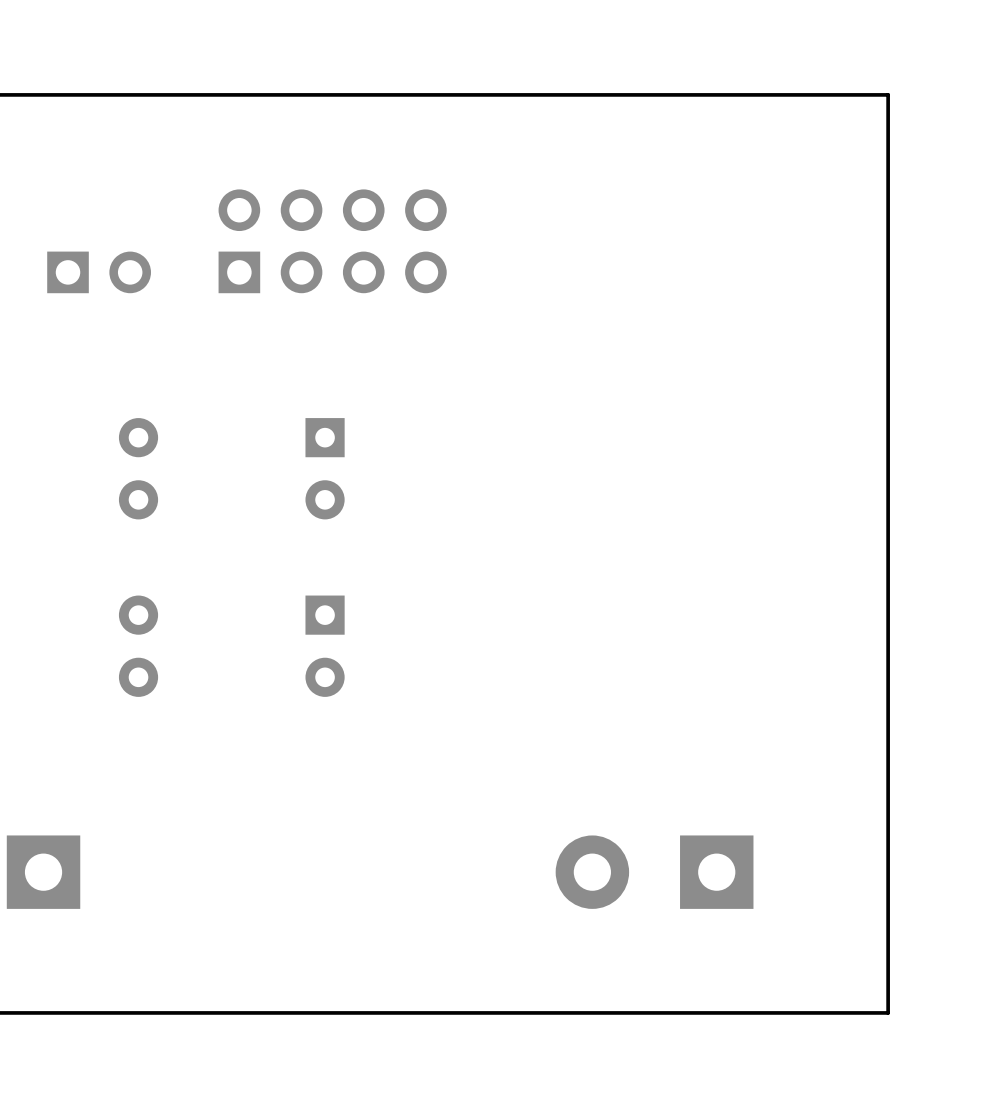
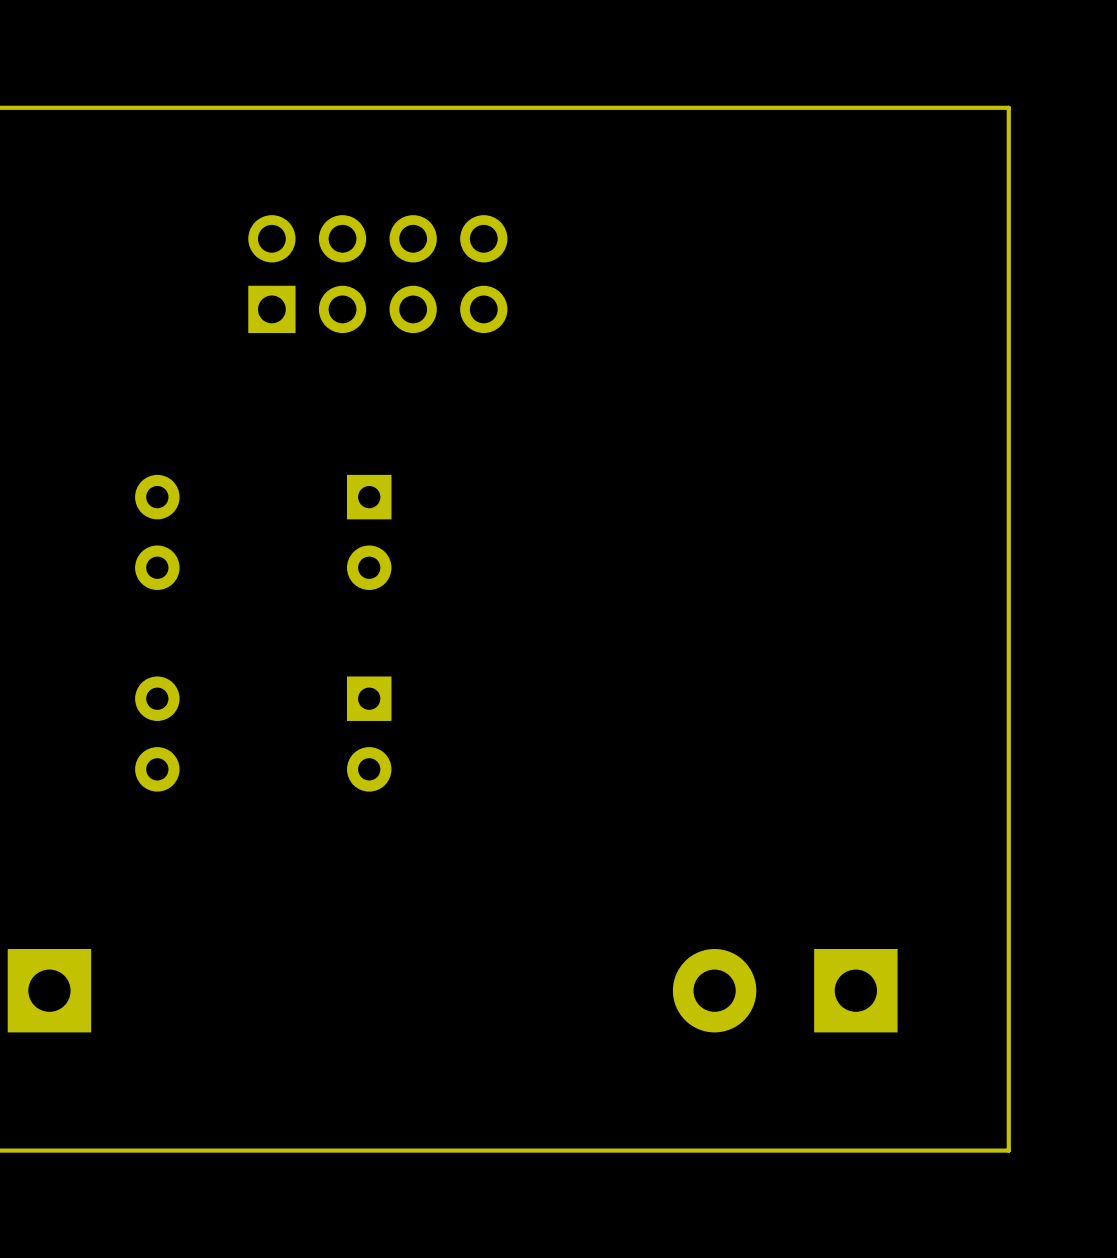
part: (99, 272) -> none
part position: (654, 872) -> (785, 990)

